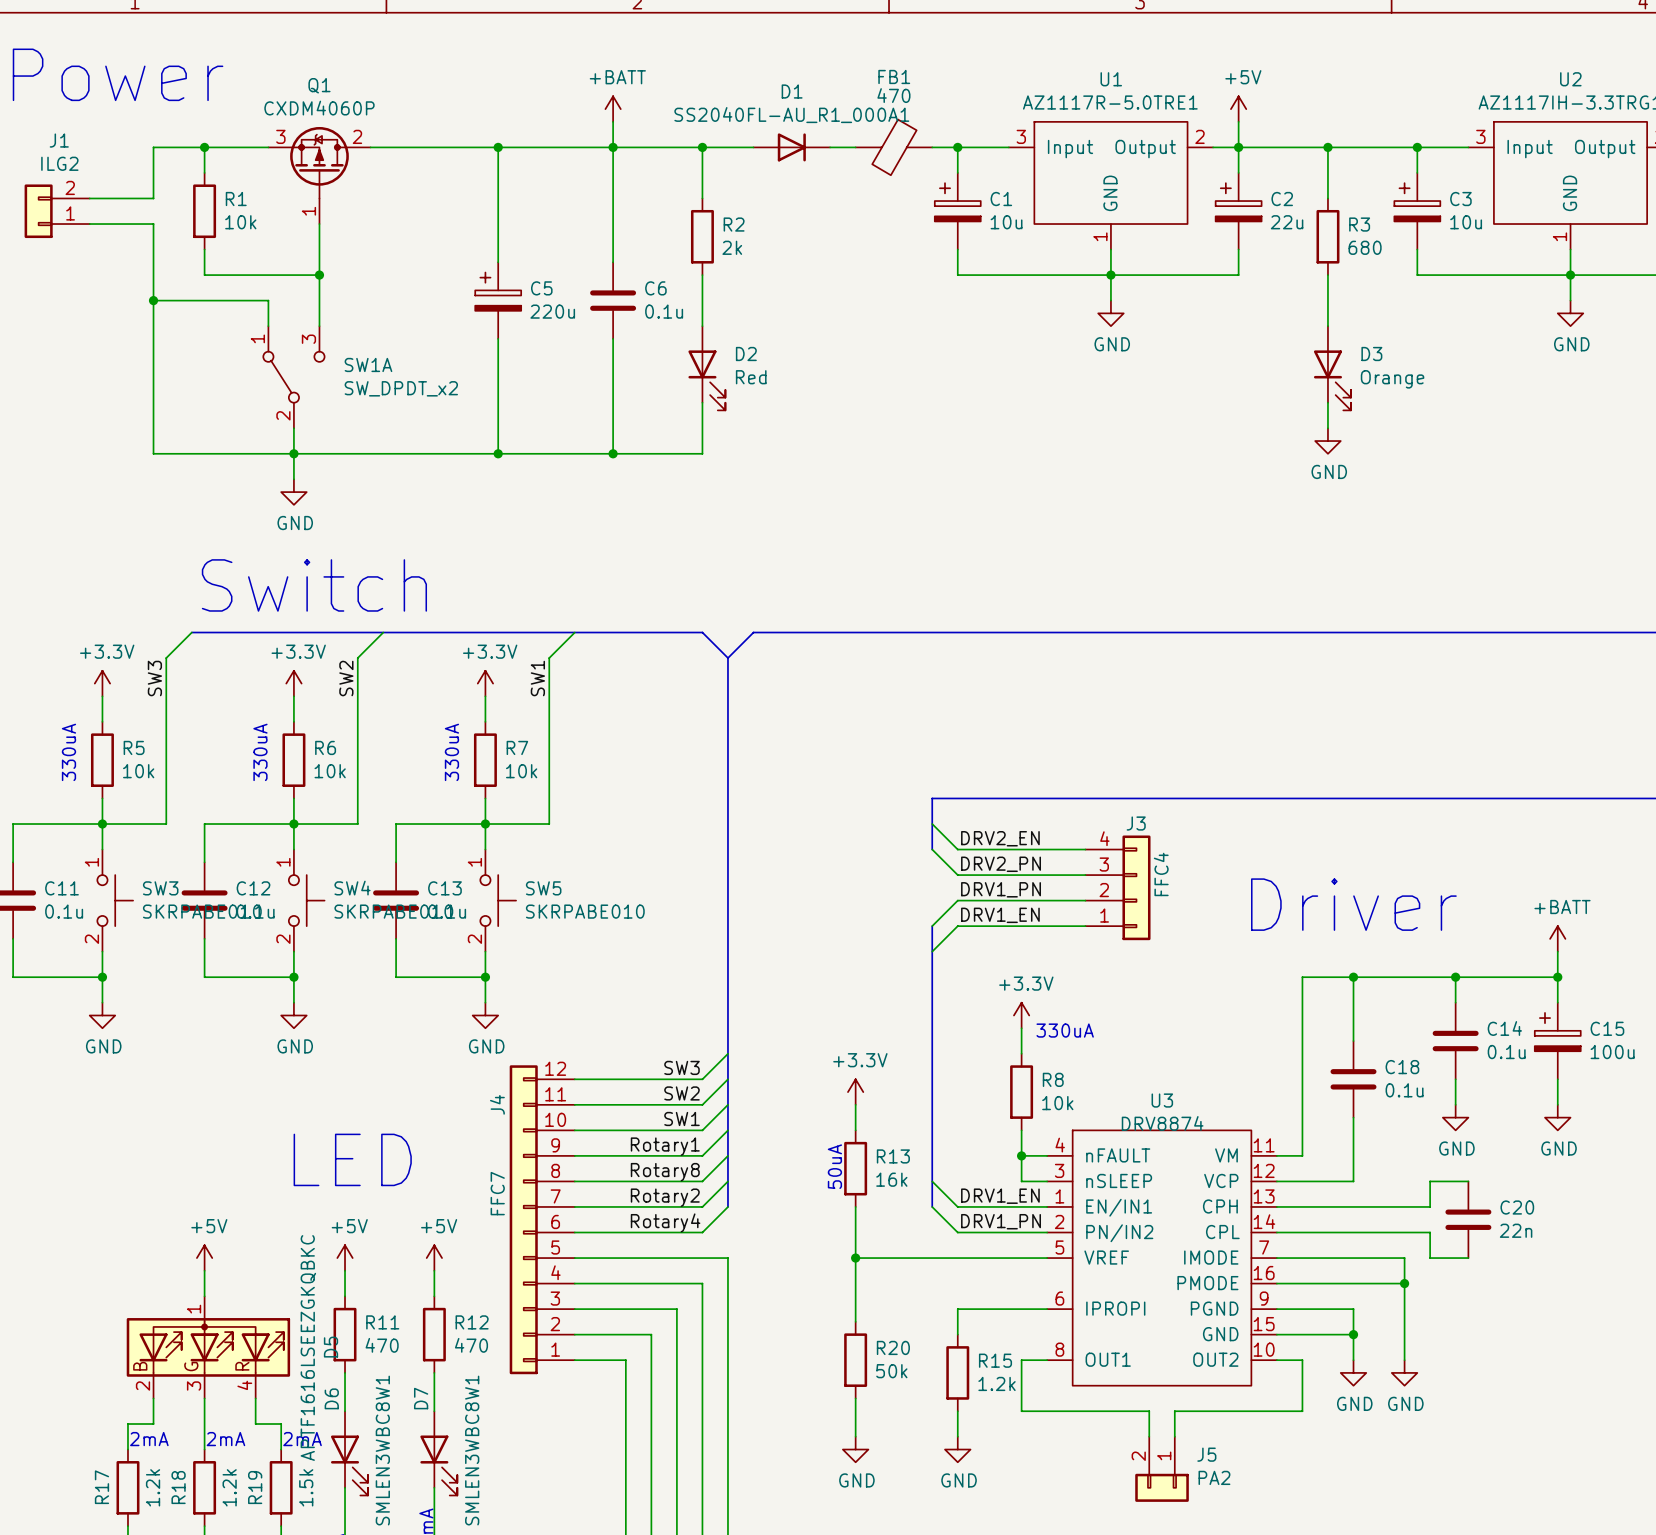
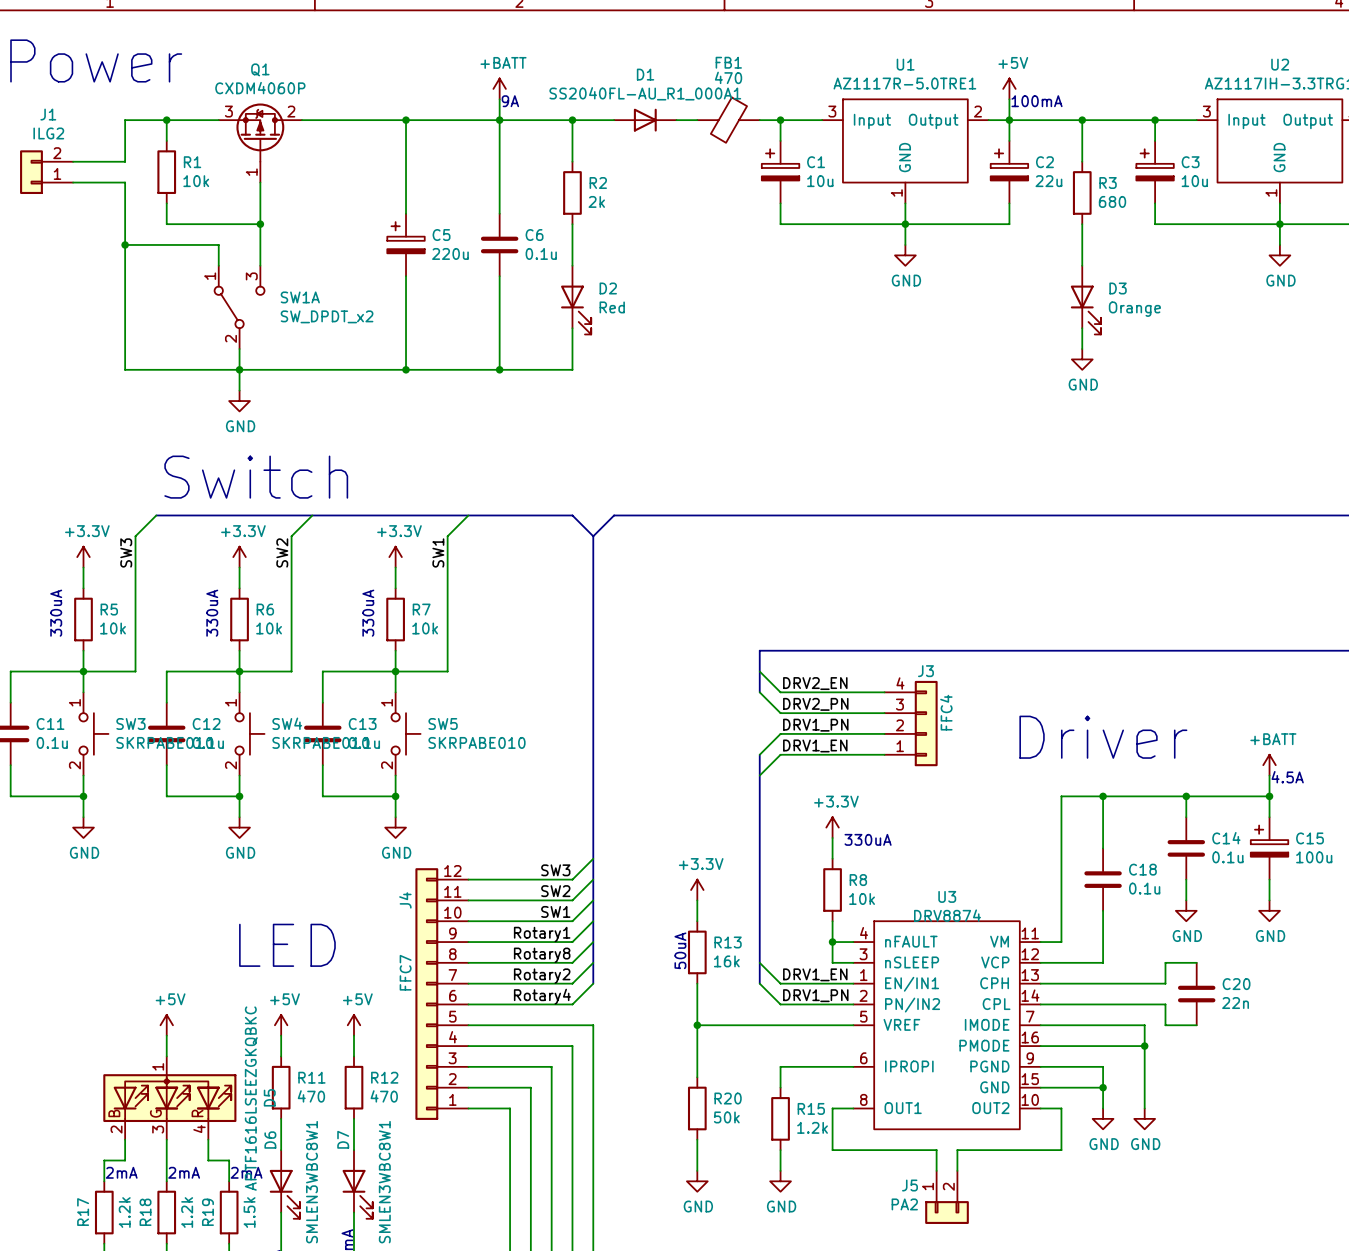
text: none -> 9A (510, 101)
text: none -> 100mA (1037, 101)
text: none -> 4.5A (1287, 777)
J5 flip: as is (1162, 1487) -> left-right (947, 1212)

